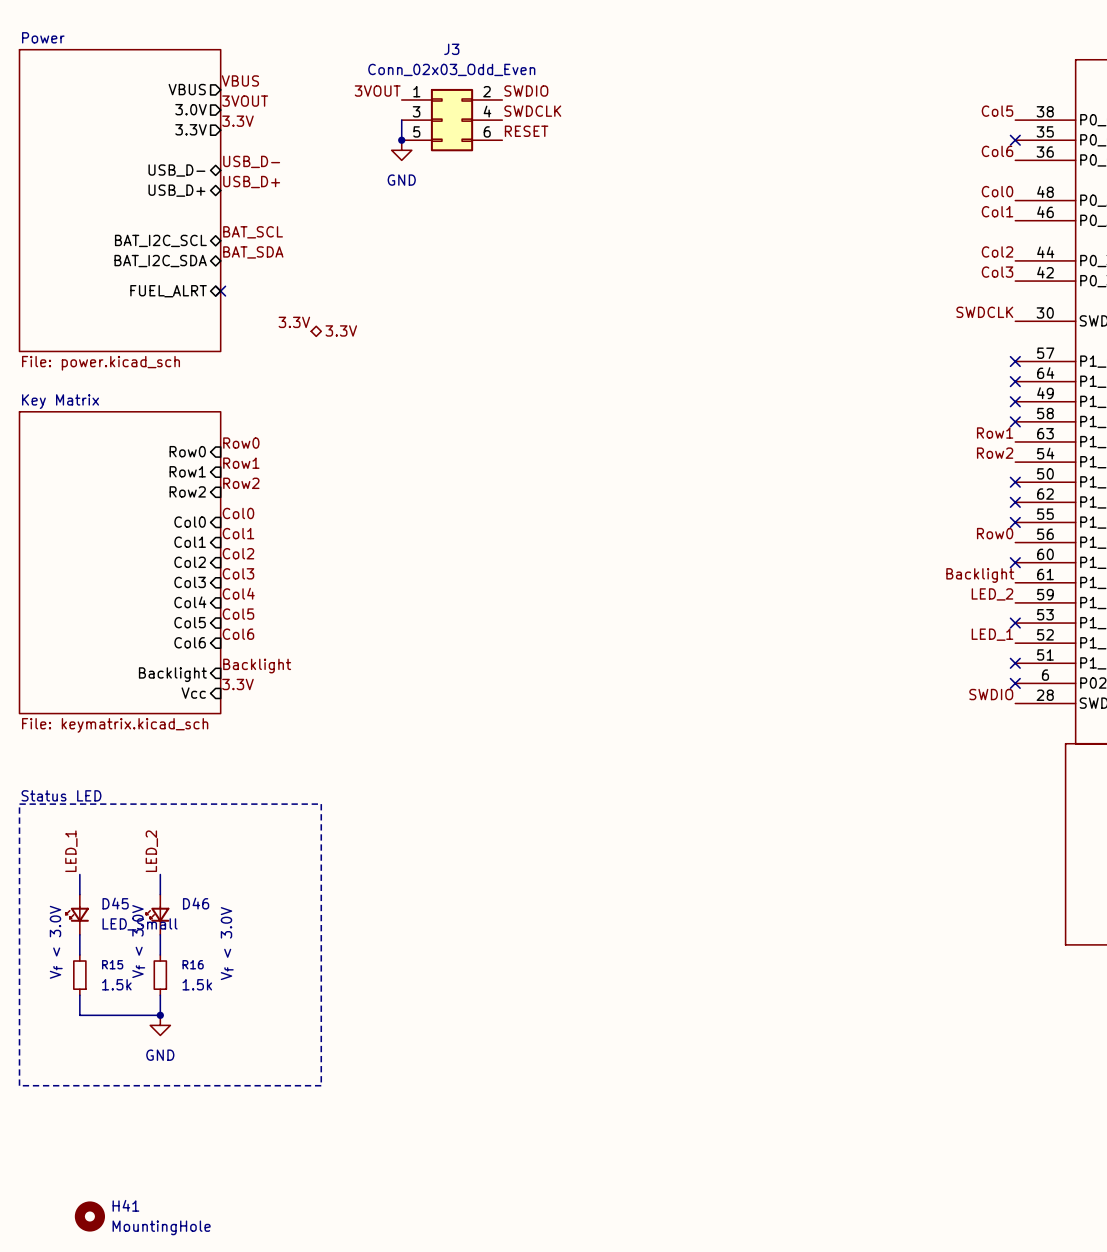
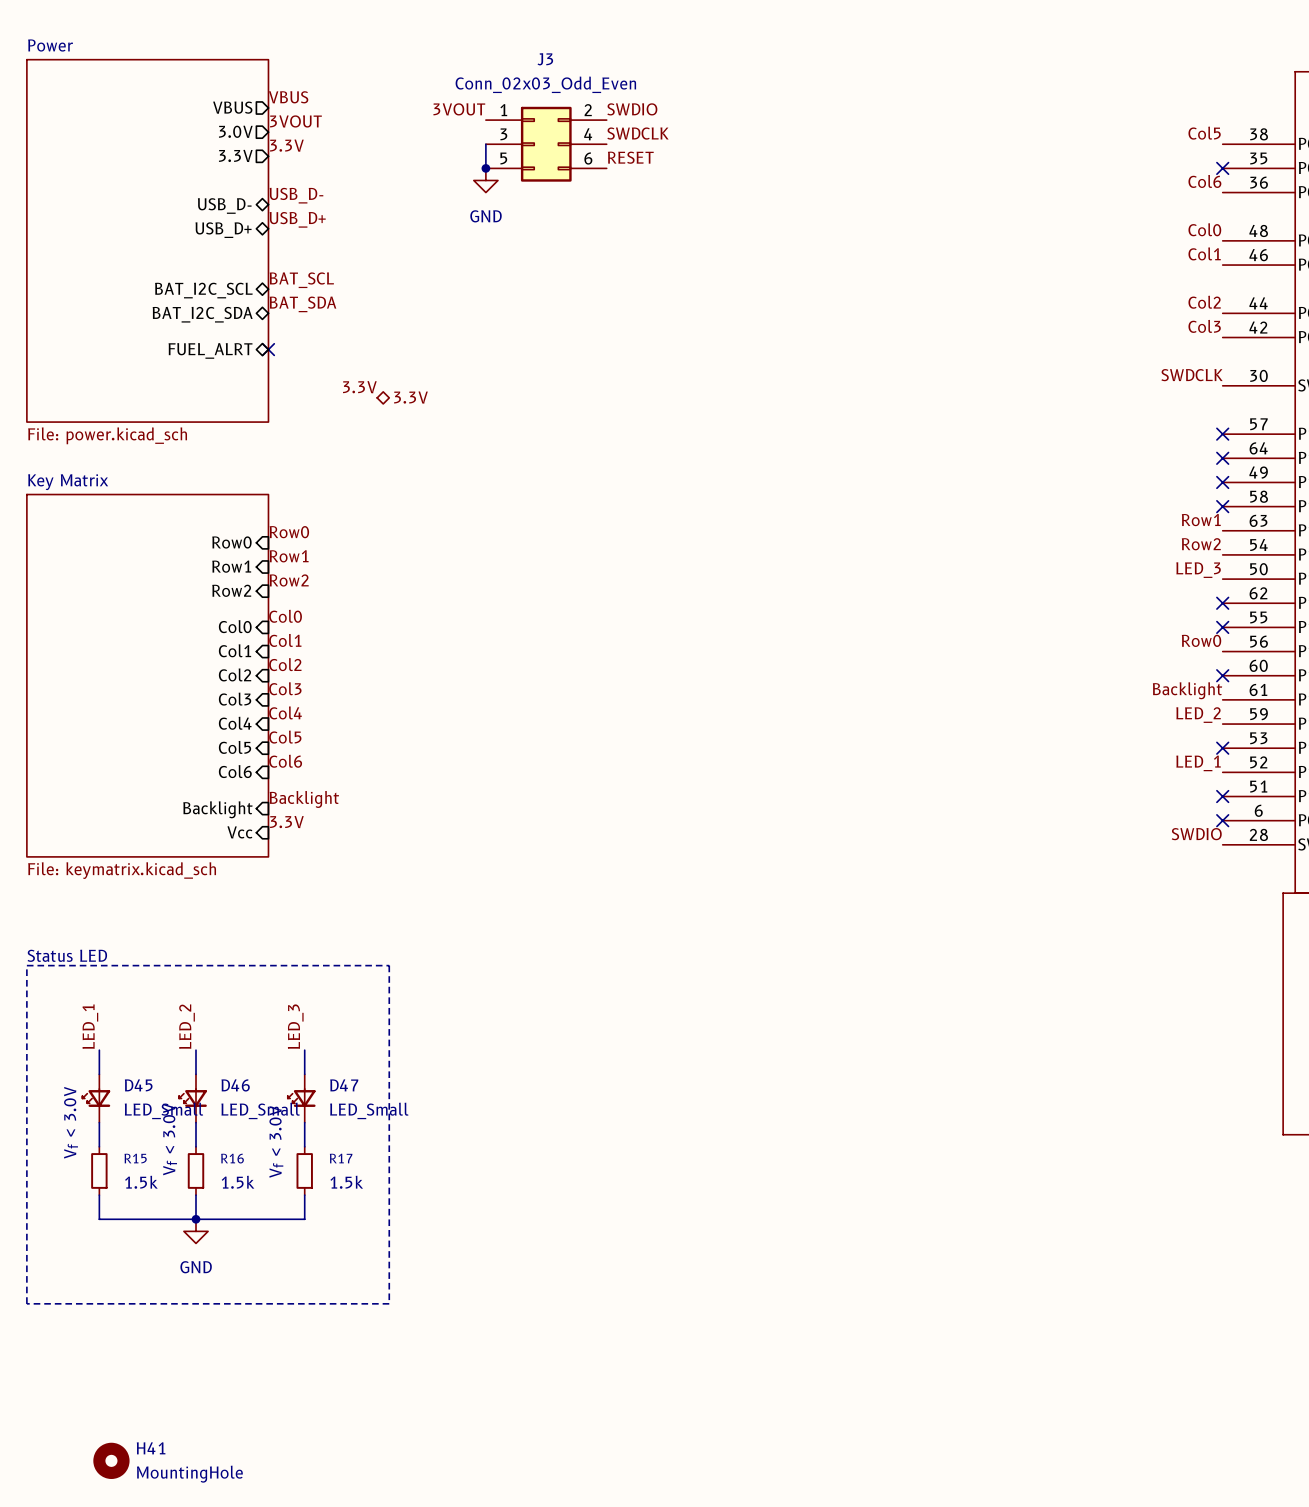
label: none -> LED_3 (1198, 570)
no-connect mark: (1015, 482) -> none
label: none -> LED_3 (295, 1026)
wire: none -> (304, 1050) (304, 1074)
D47: none -> LED_Small (301, 1098)
D46 value: none -> LED_Small (260, 1110)
wire: none -> (304, 1122) (304, 1146)
R17: none -> 1.5k (304, 1170)
wire: none -> (304, 1195) (304, 1219) (196, 1219)

